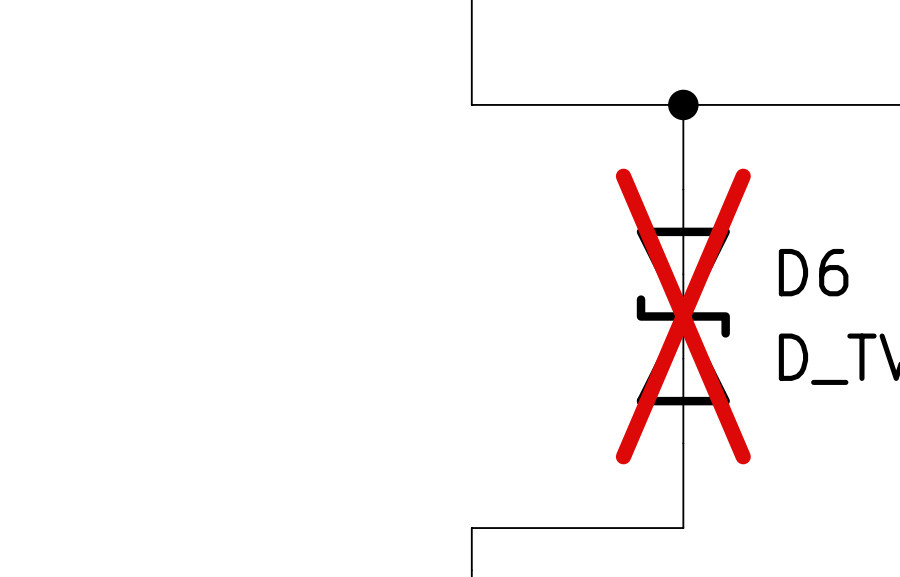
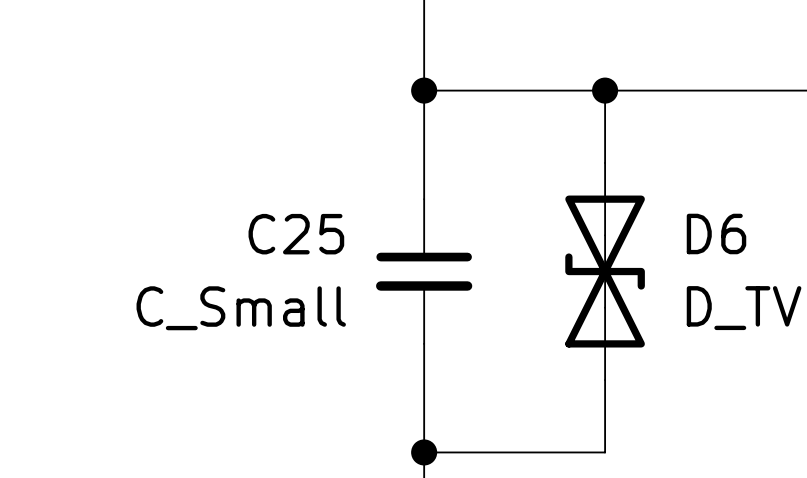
wire: none -> (424, 90) (424, 199)
junction: none -> (424, 90)
C25: none -> C_Small (424, 271)
D6 do-not-place cross: (683, 316) -> none
wire: none -> (424, 343) (424, 452)
junction: none -> (424, 452)

